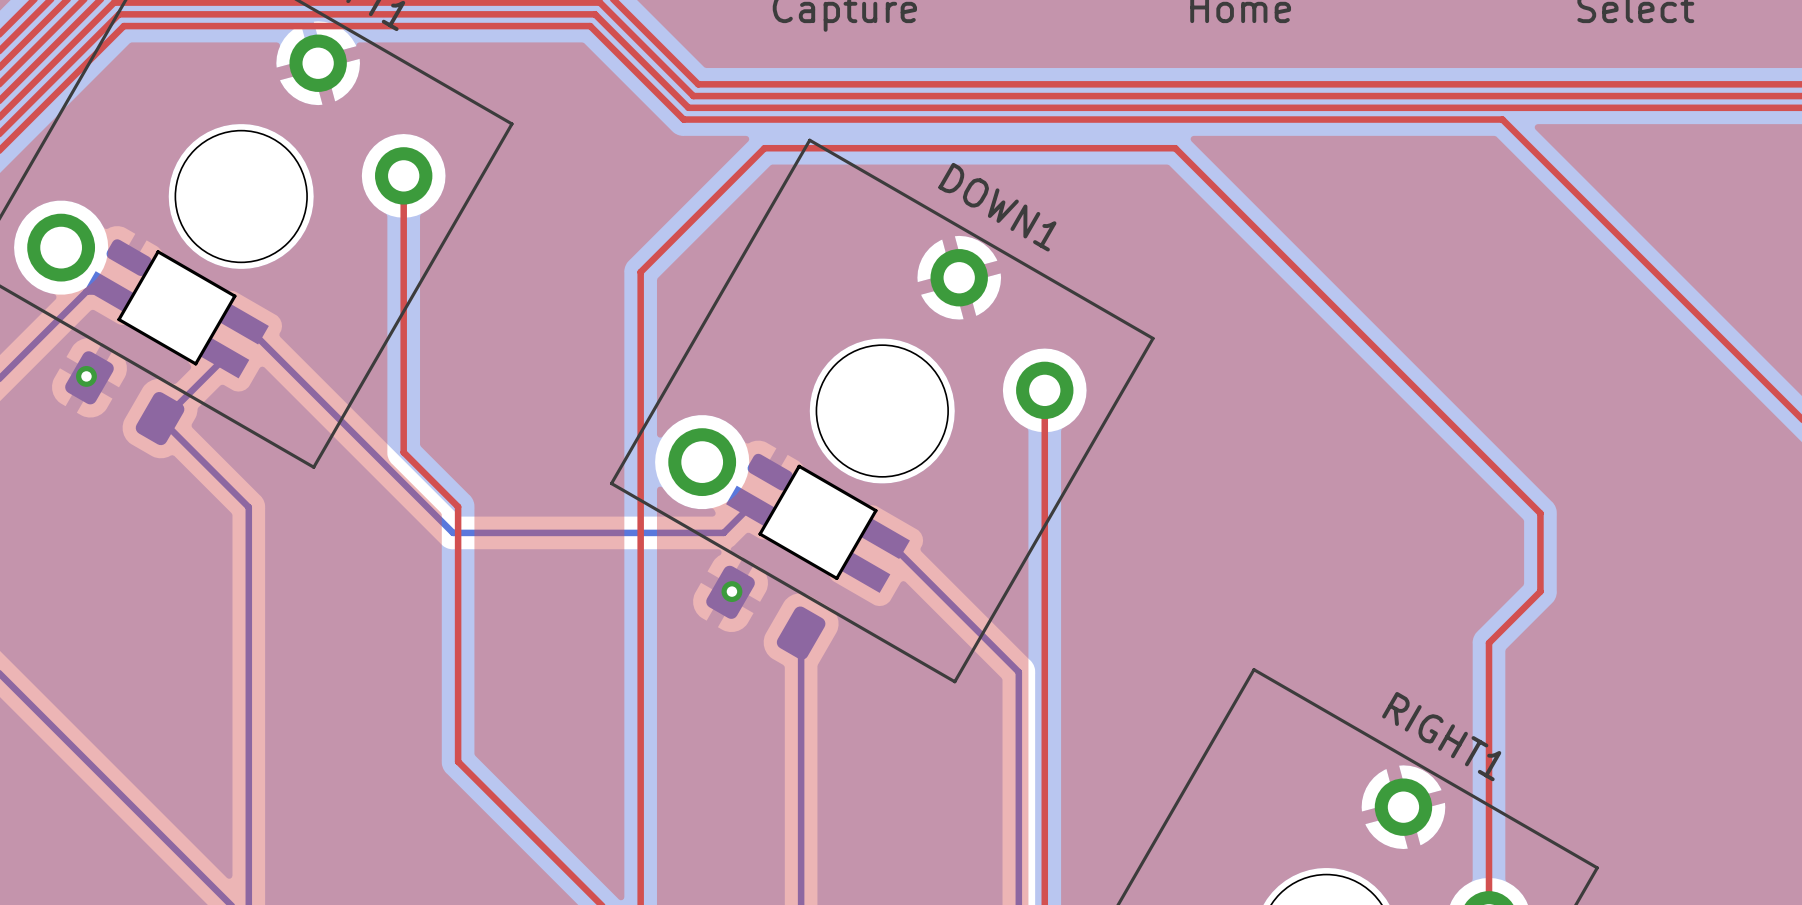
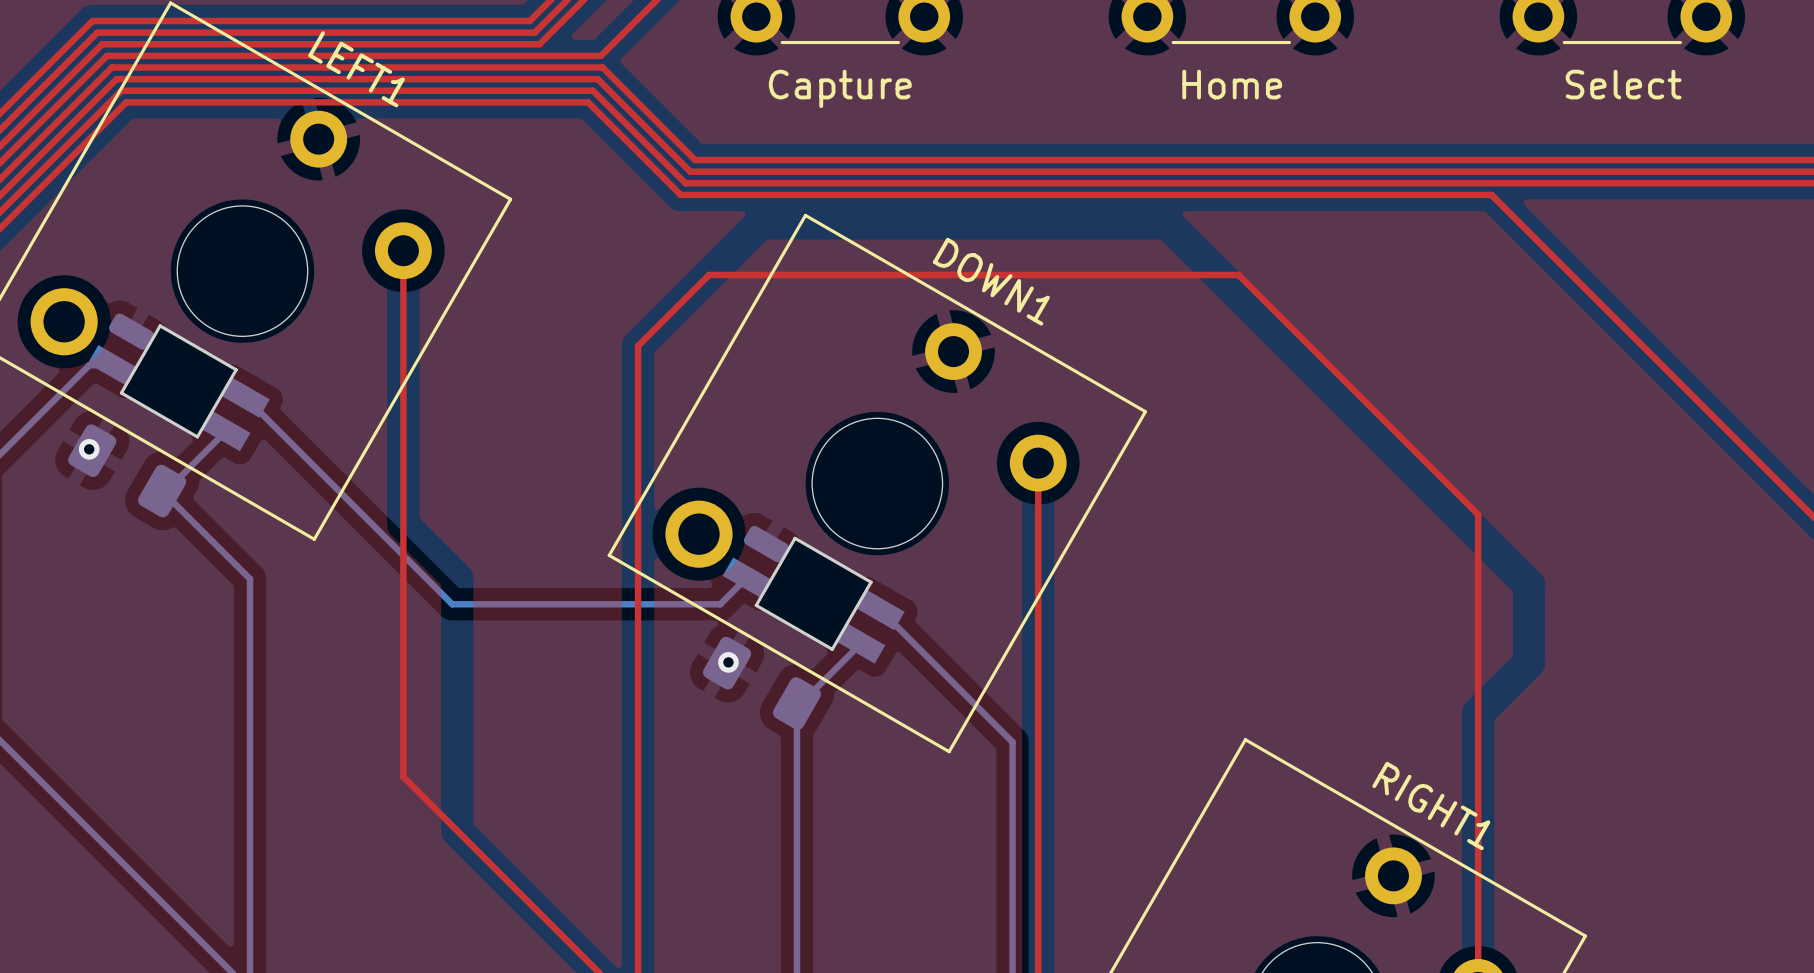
top track: (712, 200) (764, 148) (1175, 148) (1540, 513) (1540, 591) (1489, 643) -> (709, 274) (1238, 274) (1478, 514) (1478, 713)
top track: (403, 452) (458, 506) (458, 761) -> (403, 524) (403, 776) (457, 830)
bottom track: none -> (861, 643) (801, 703) (796, 703)

